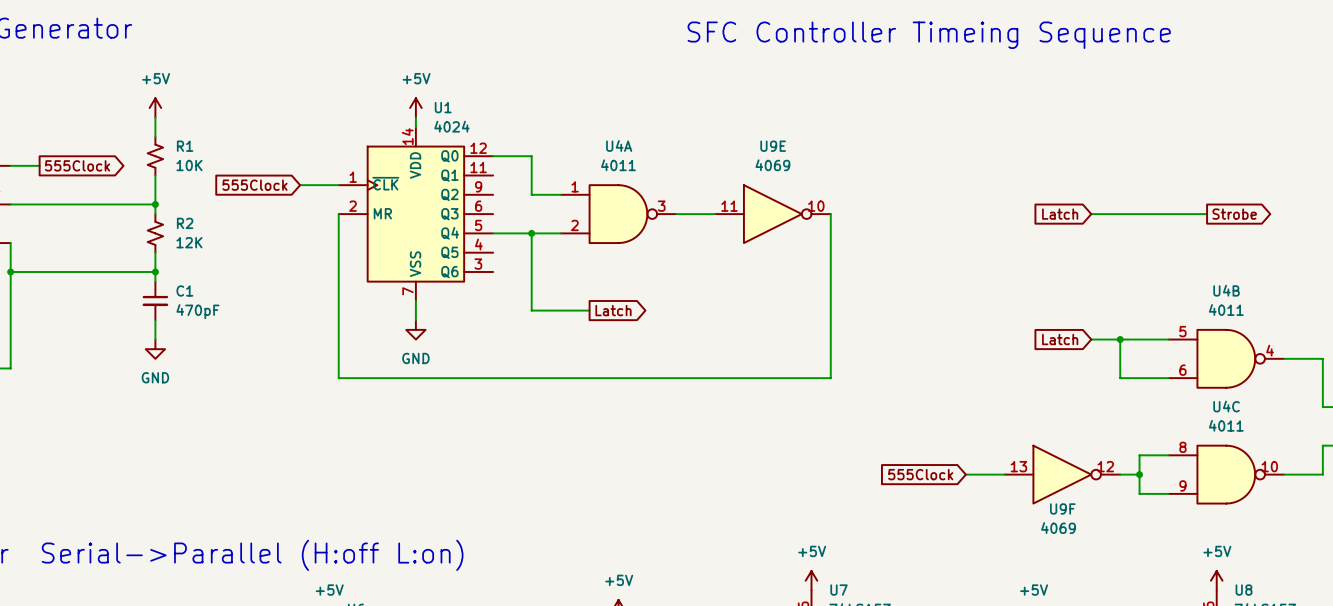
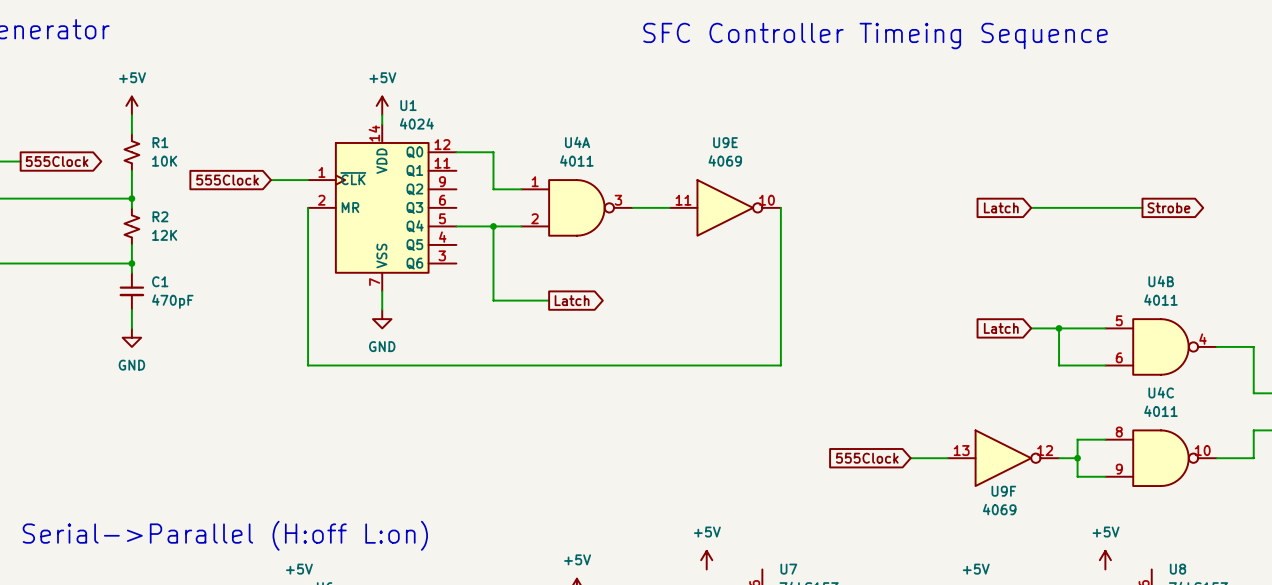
power symbol position: +5V (811, 580) -> +5V (706, 560)
power symbol position: +5V (1216, 580) -> +5V (1105, 560)

